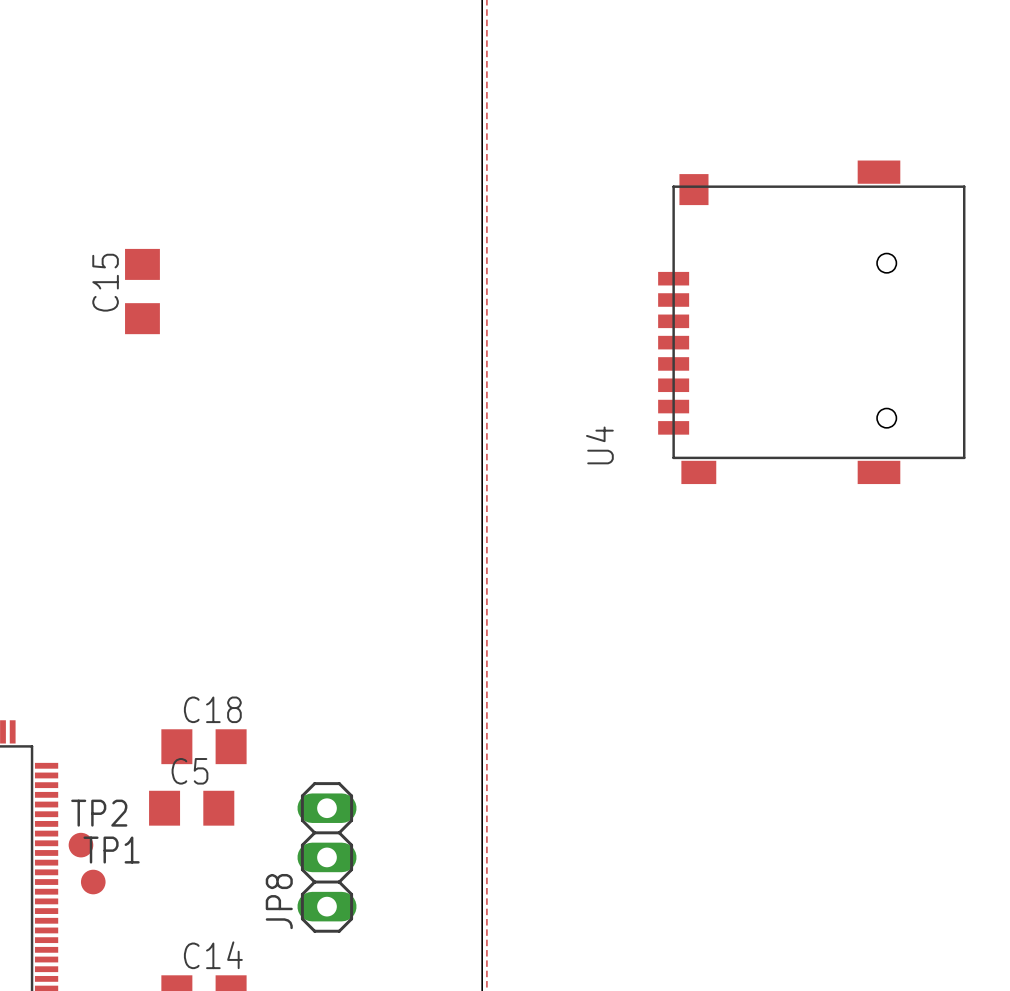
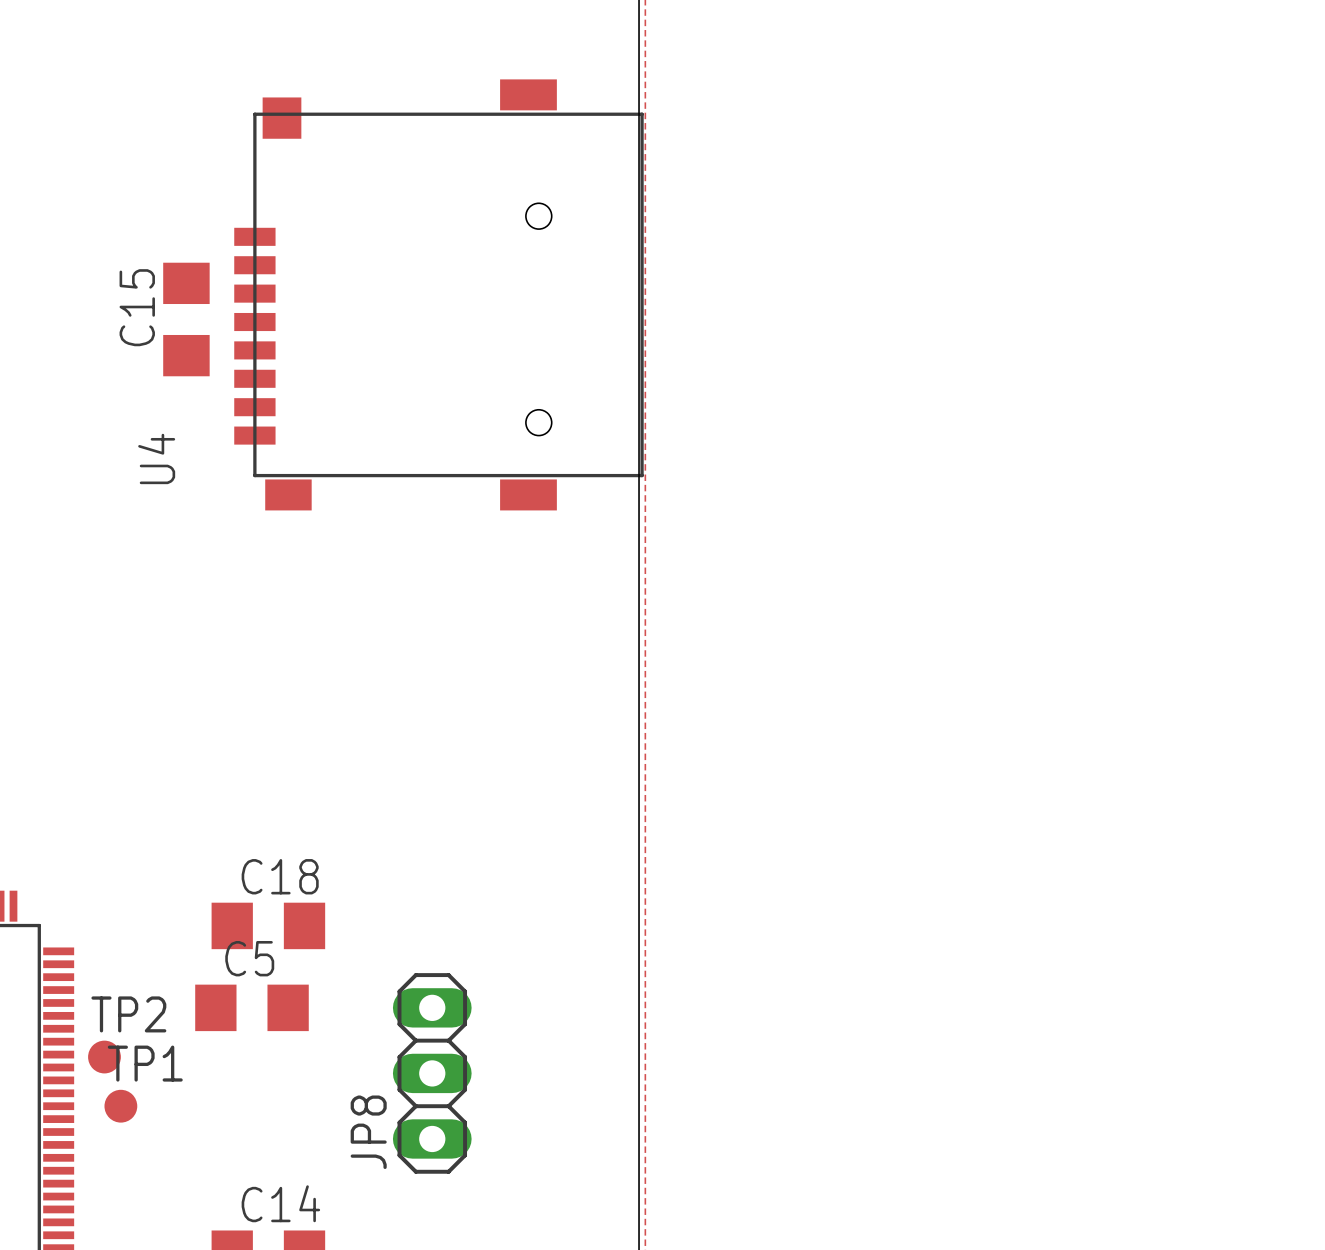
U4 position: (811, 322) -> (438, 294)

